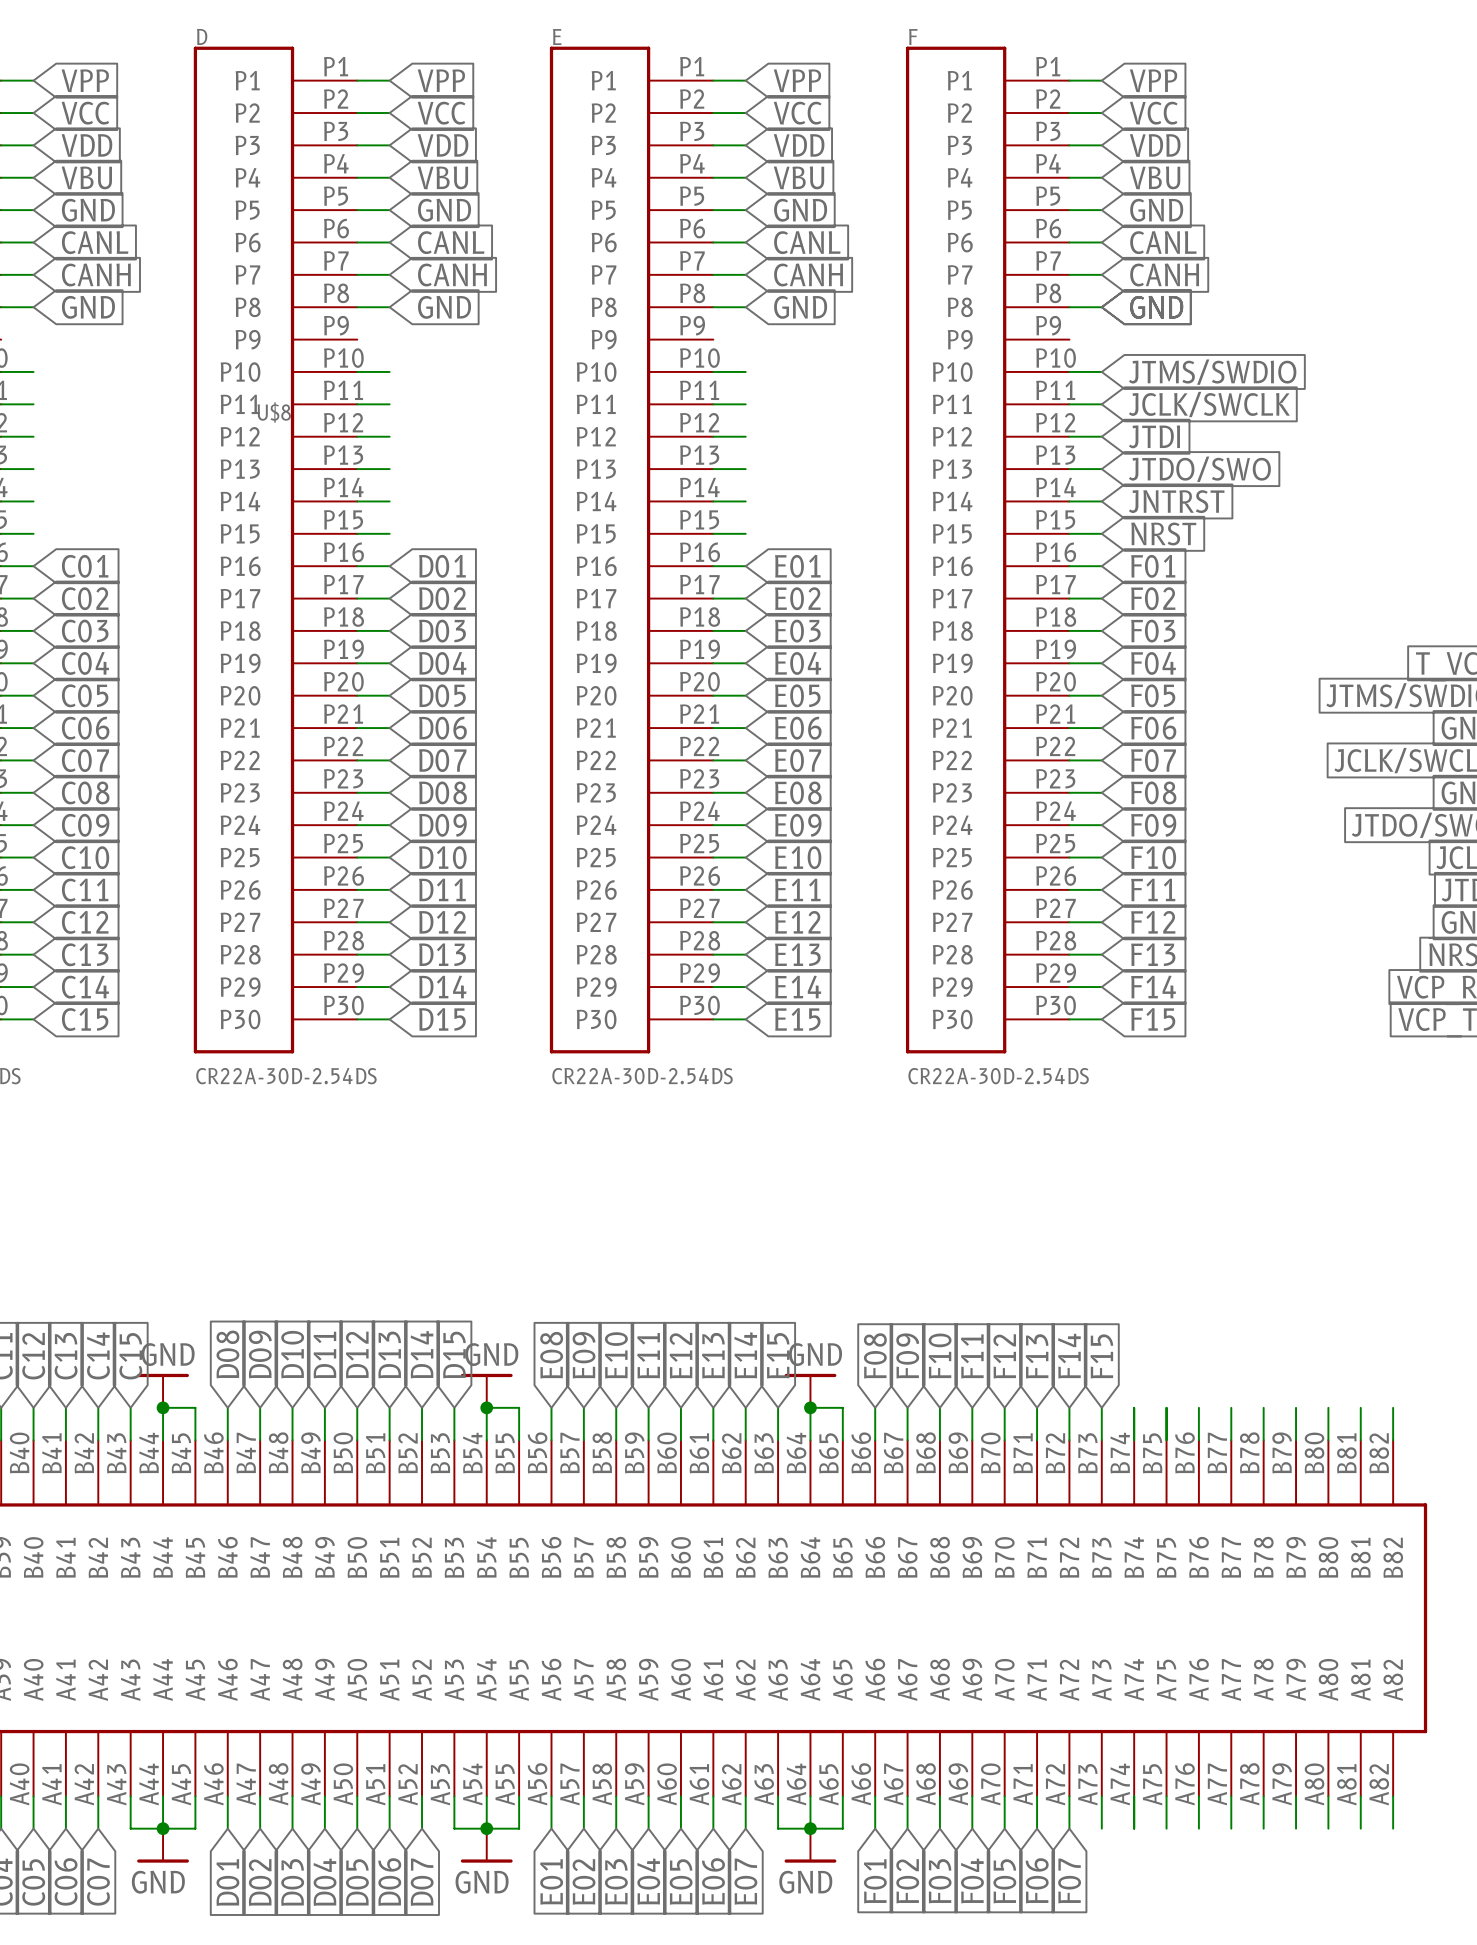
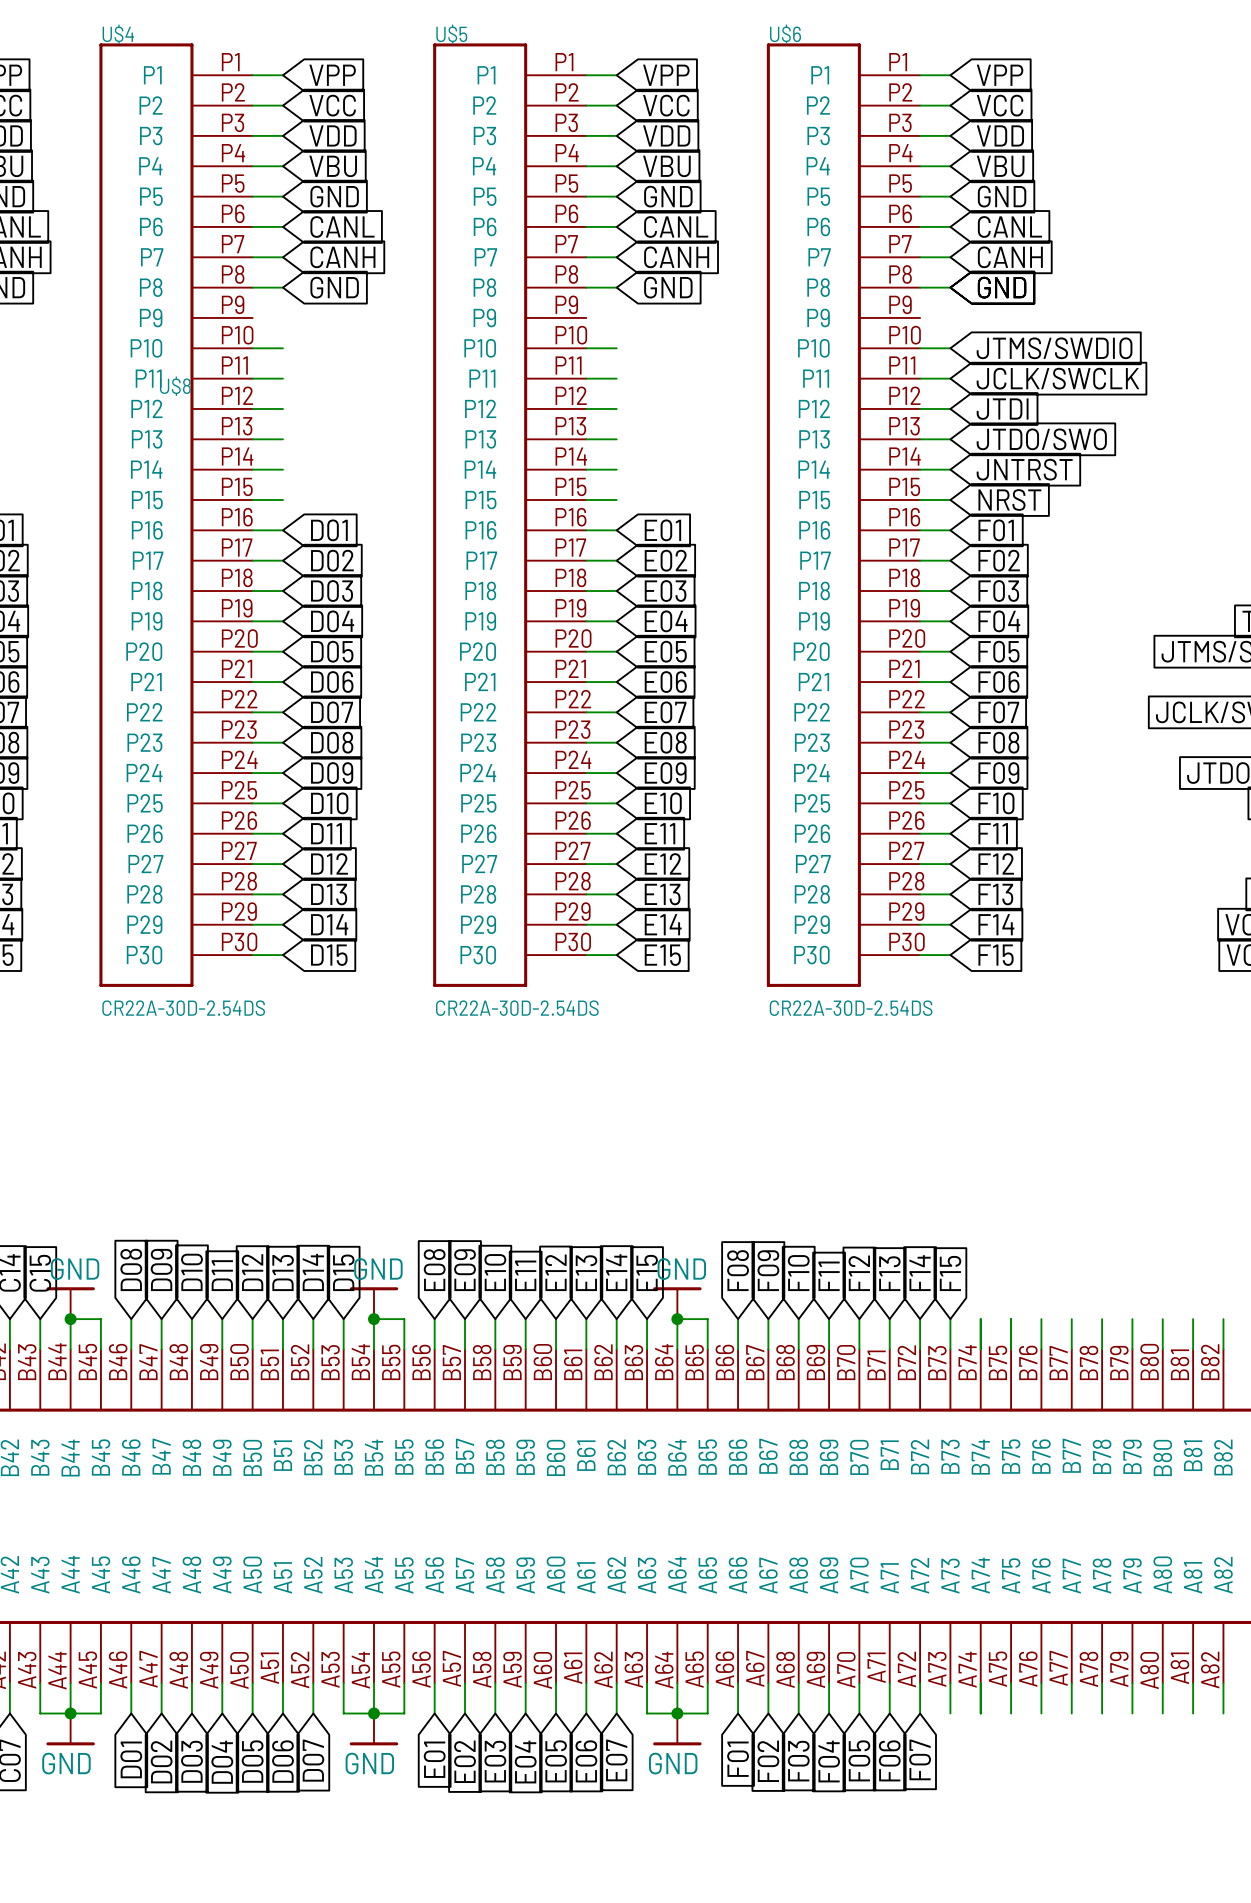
D name: D (202, 36) -> U$4 (118, 34)
E name: E (557, 37) -> U$5 (451, 34)
F name: F (913, 37) -> U$6 (785, 34)

